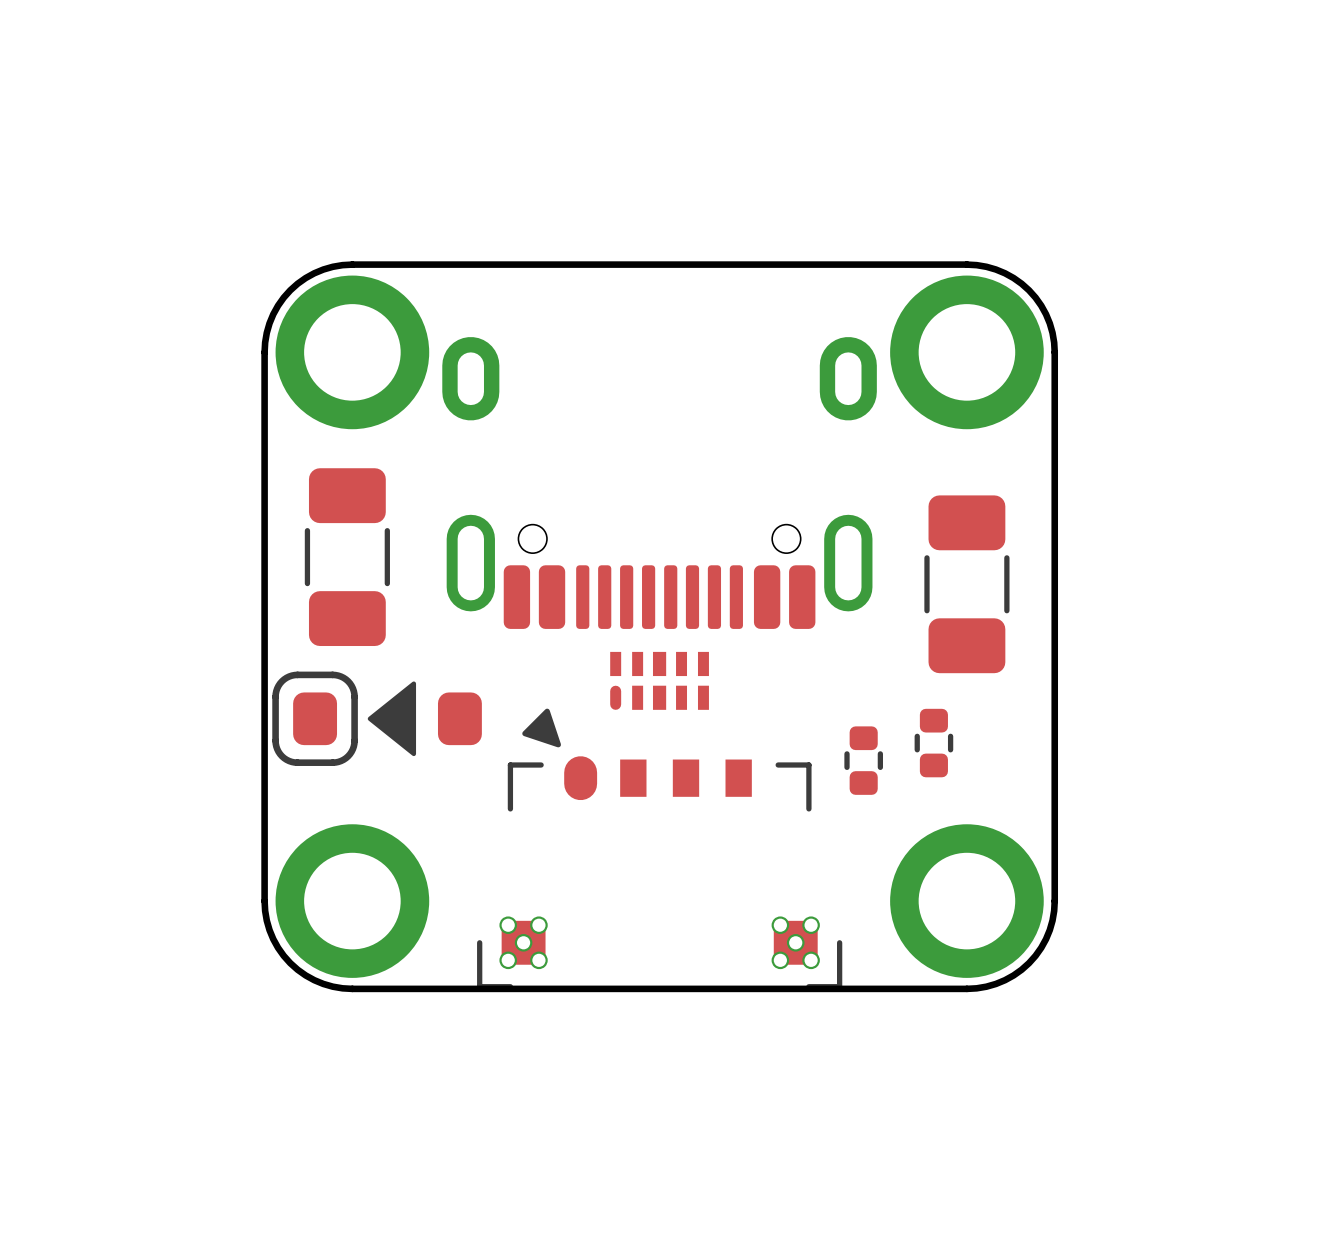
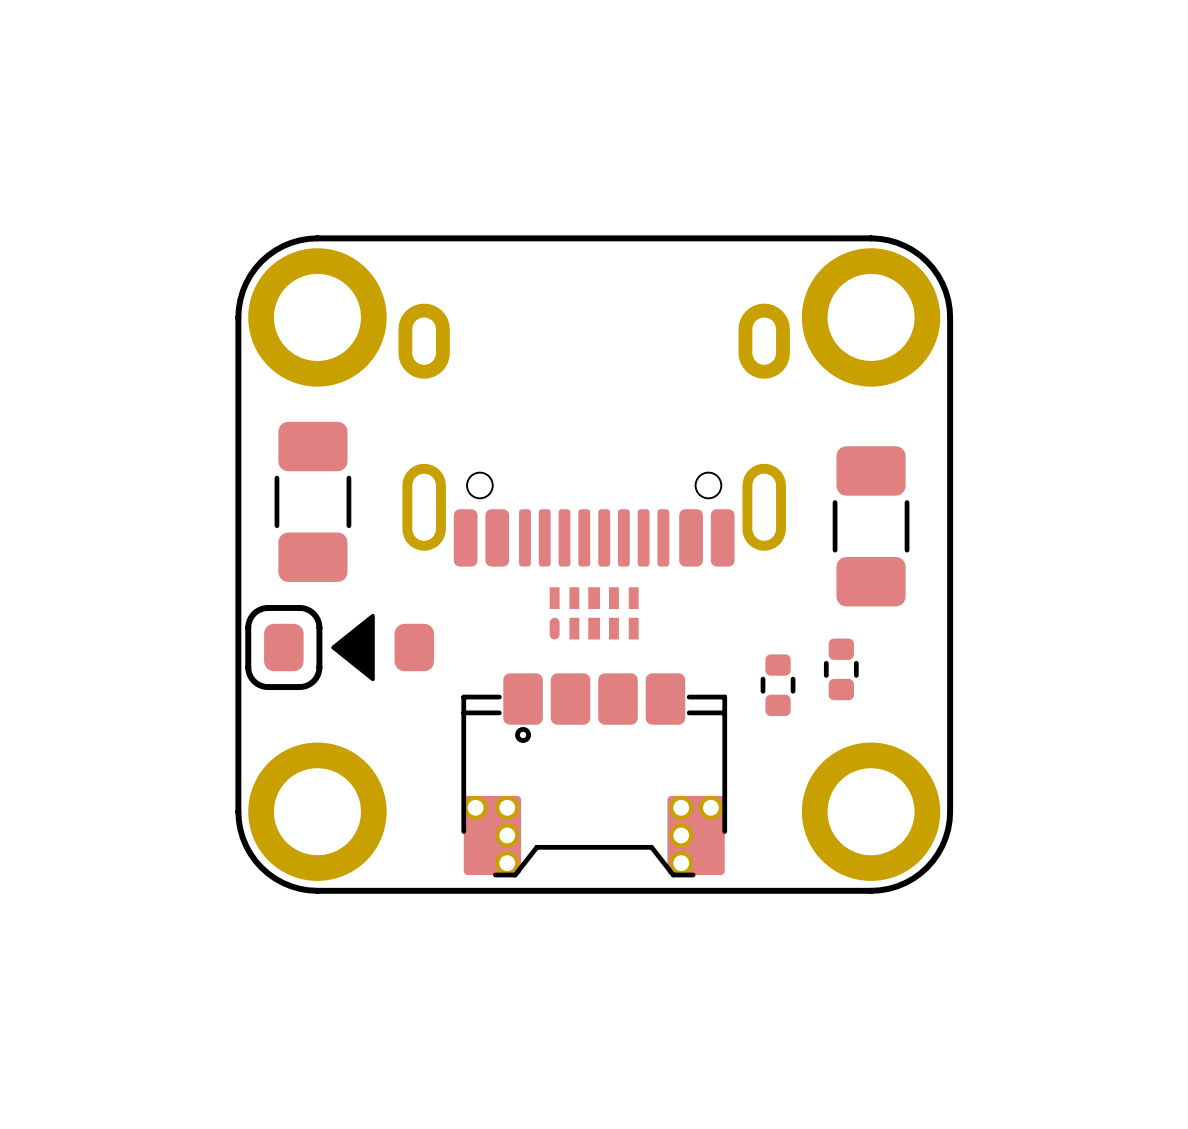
part footprint: [477, 708, 843, 990] -> [461, 673, 728, 878]

